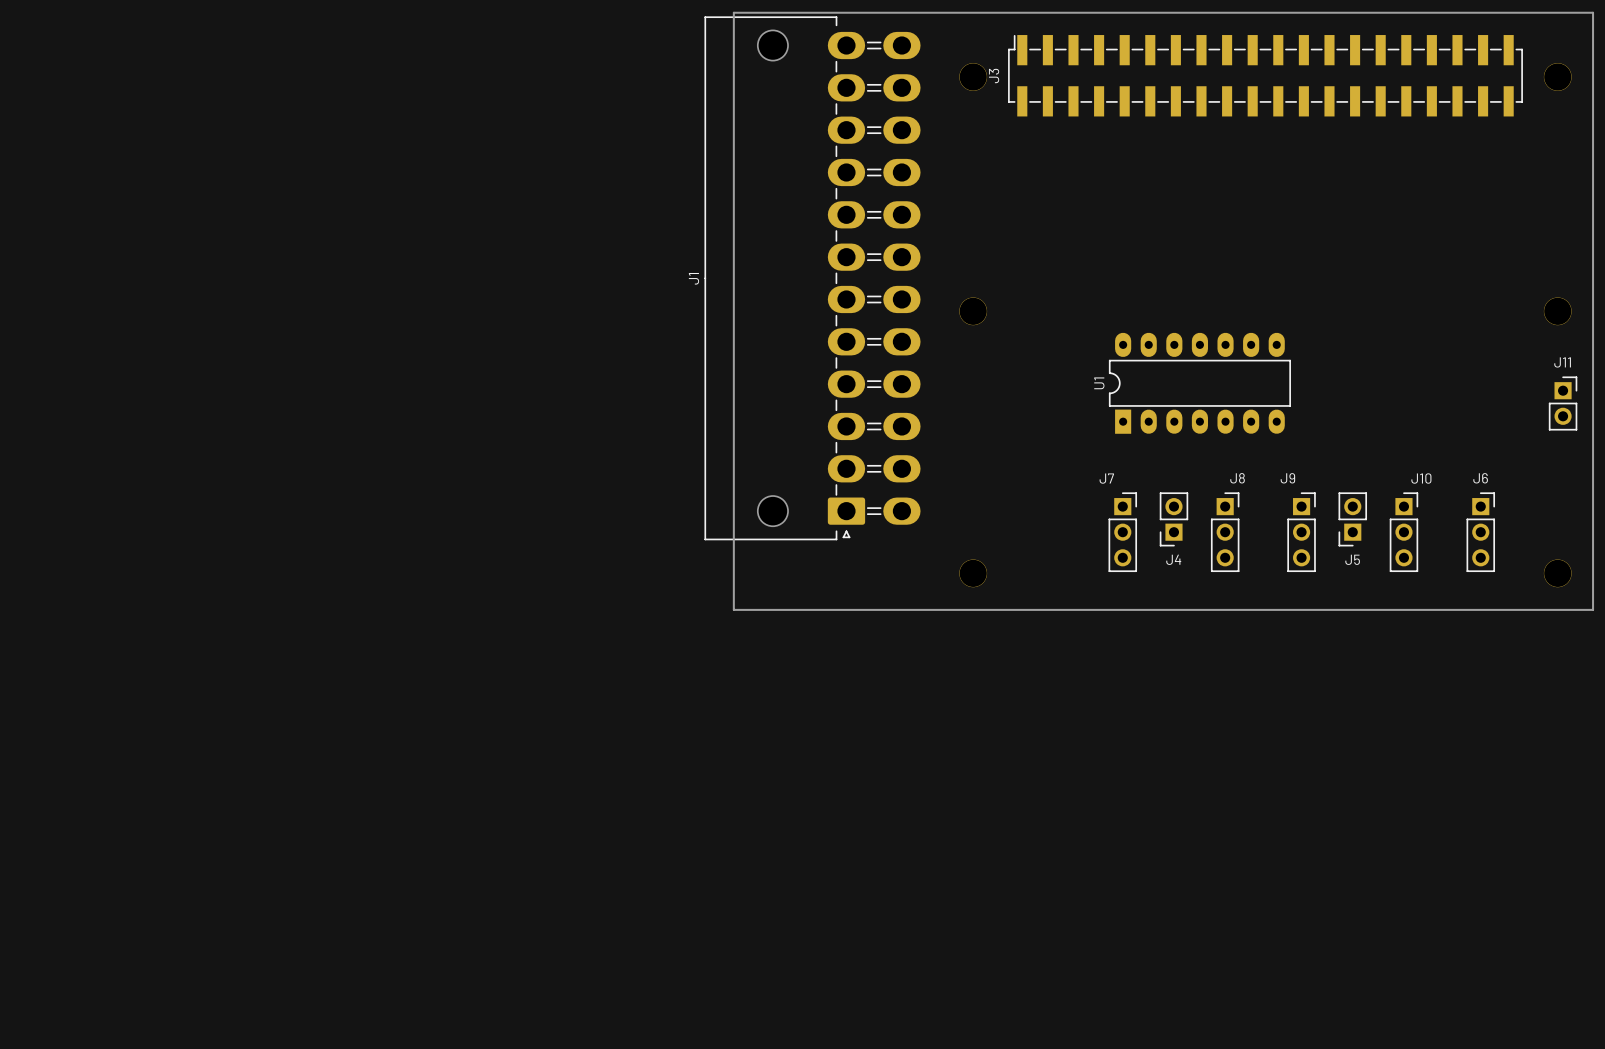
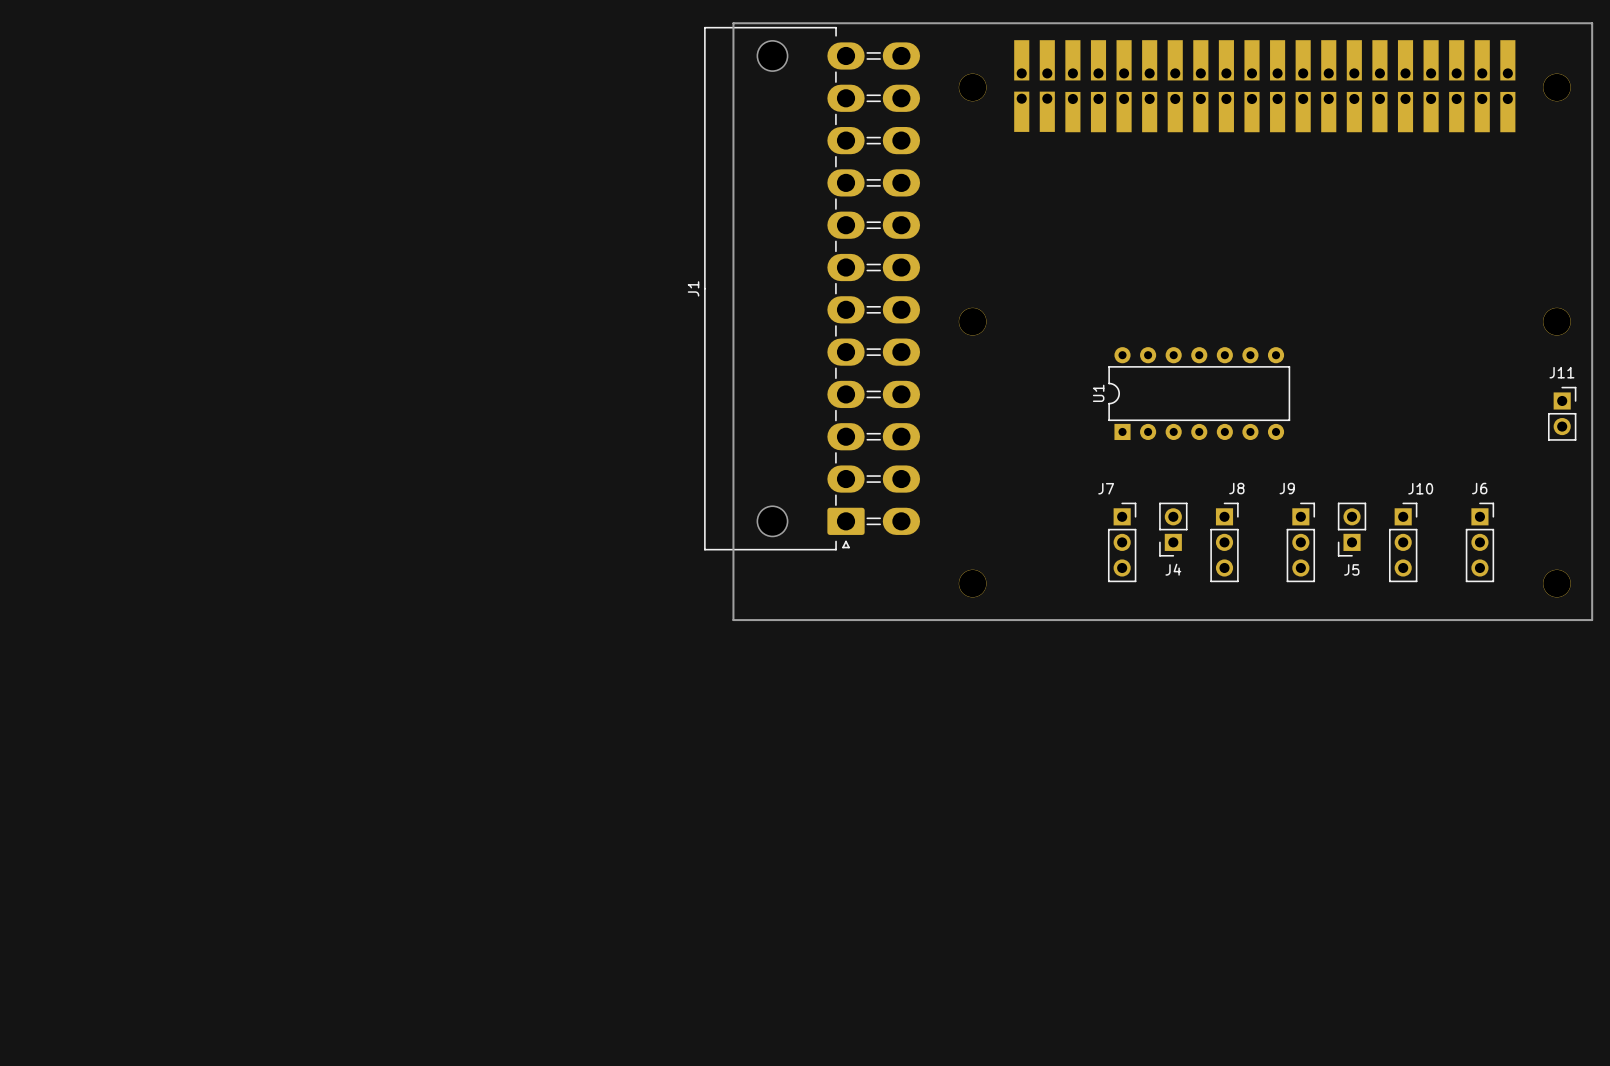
J3: (1265, 75) -> none
part: none -> (1264, 86)
U1 footprint: [1109, 332, 1291, 434] -> [1108, 347, 1291, 441]

